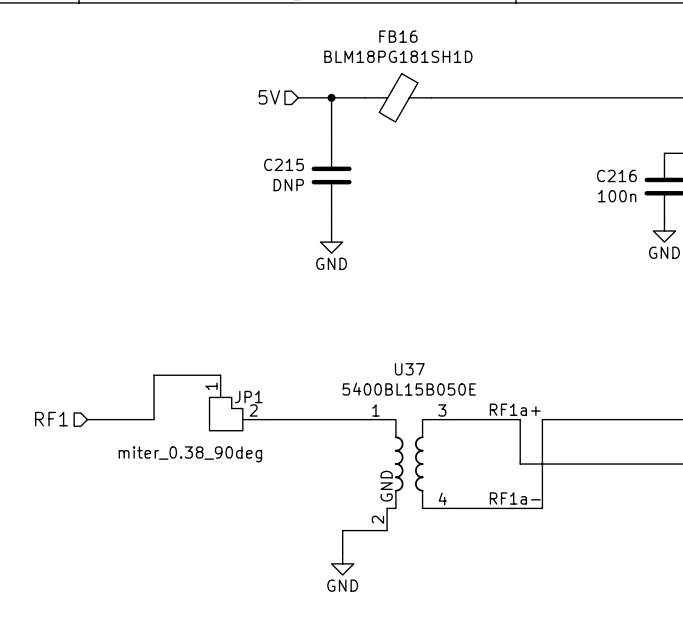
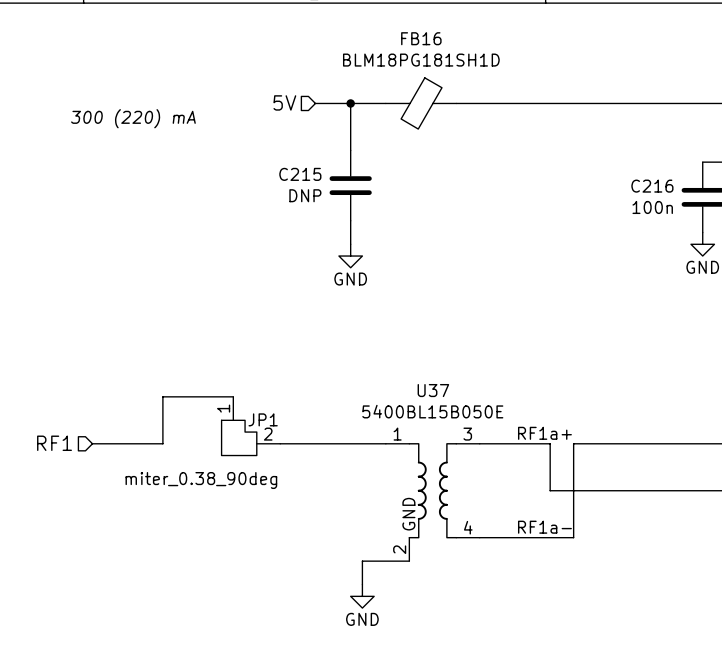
text: none -> 300 (220) mA (133, 118)

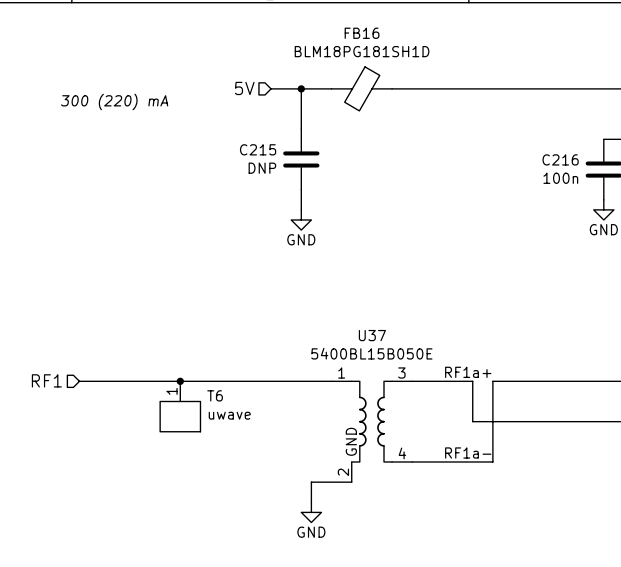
wire: (233, 396) (162, 396) (162, 443) -> (240, 381) (139, 381)
JP1: miter_0.38_90deg (250, 426) -> none
junction: none -> (180, 381)
T6: none -> uwave (180, 406)

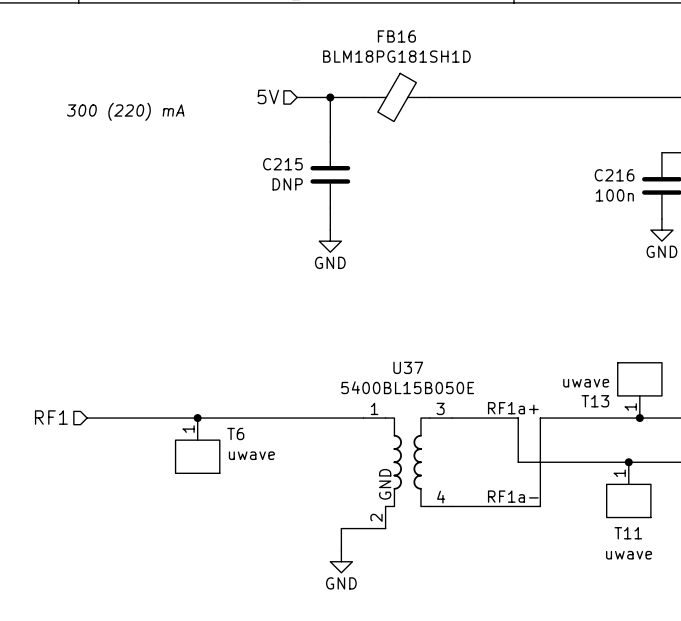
T13: none -> uwave (639, 390)
junction: none -> (639, 418)
junction: none -> (628, 462)
T11: none -> uwave (628, 490)

